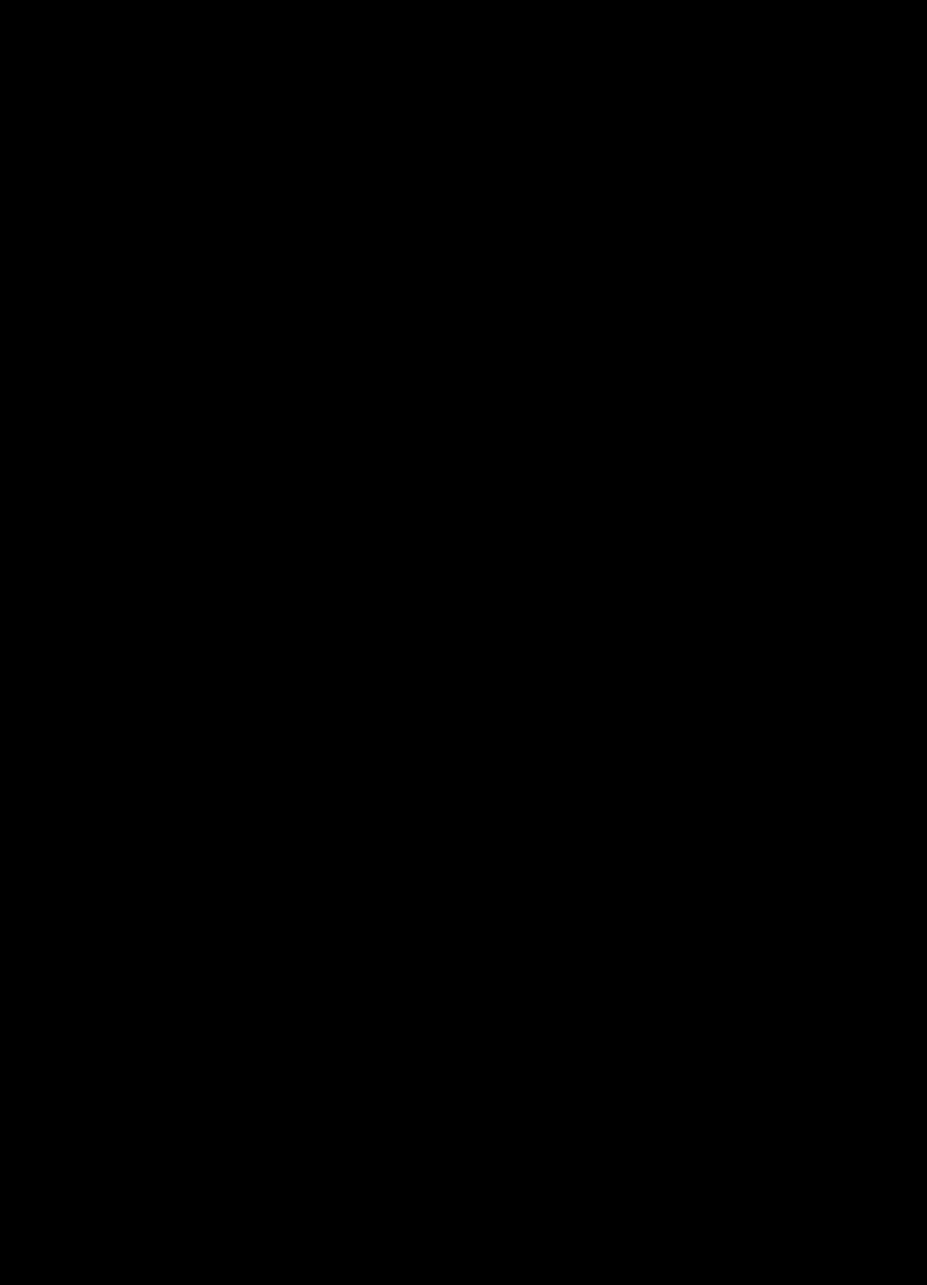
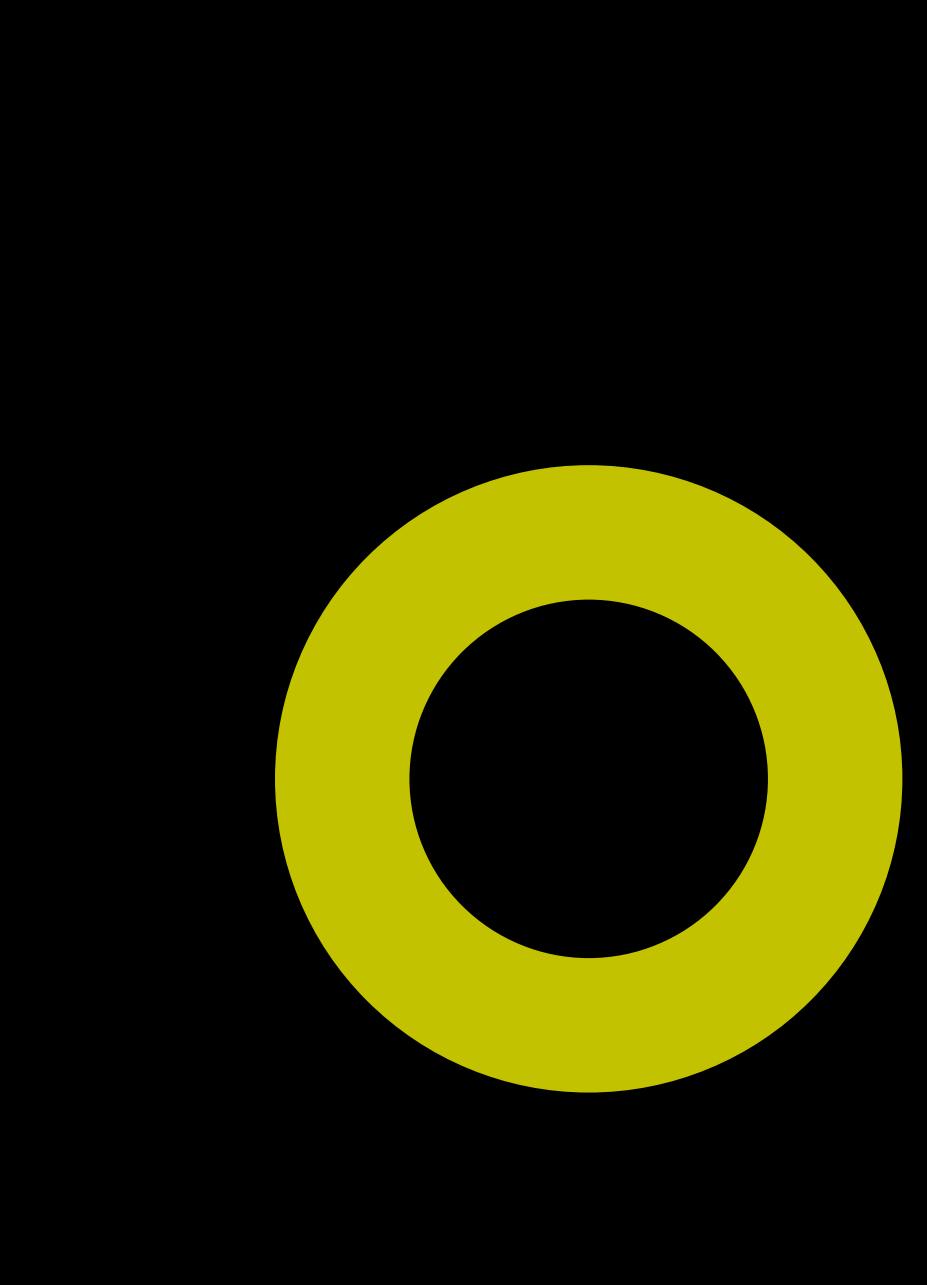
part: none -> (588, 778)

